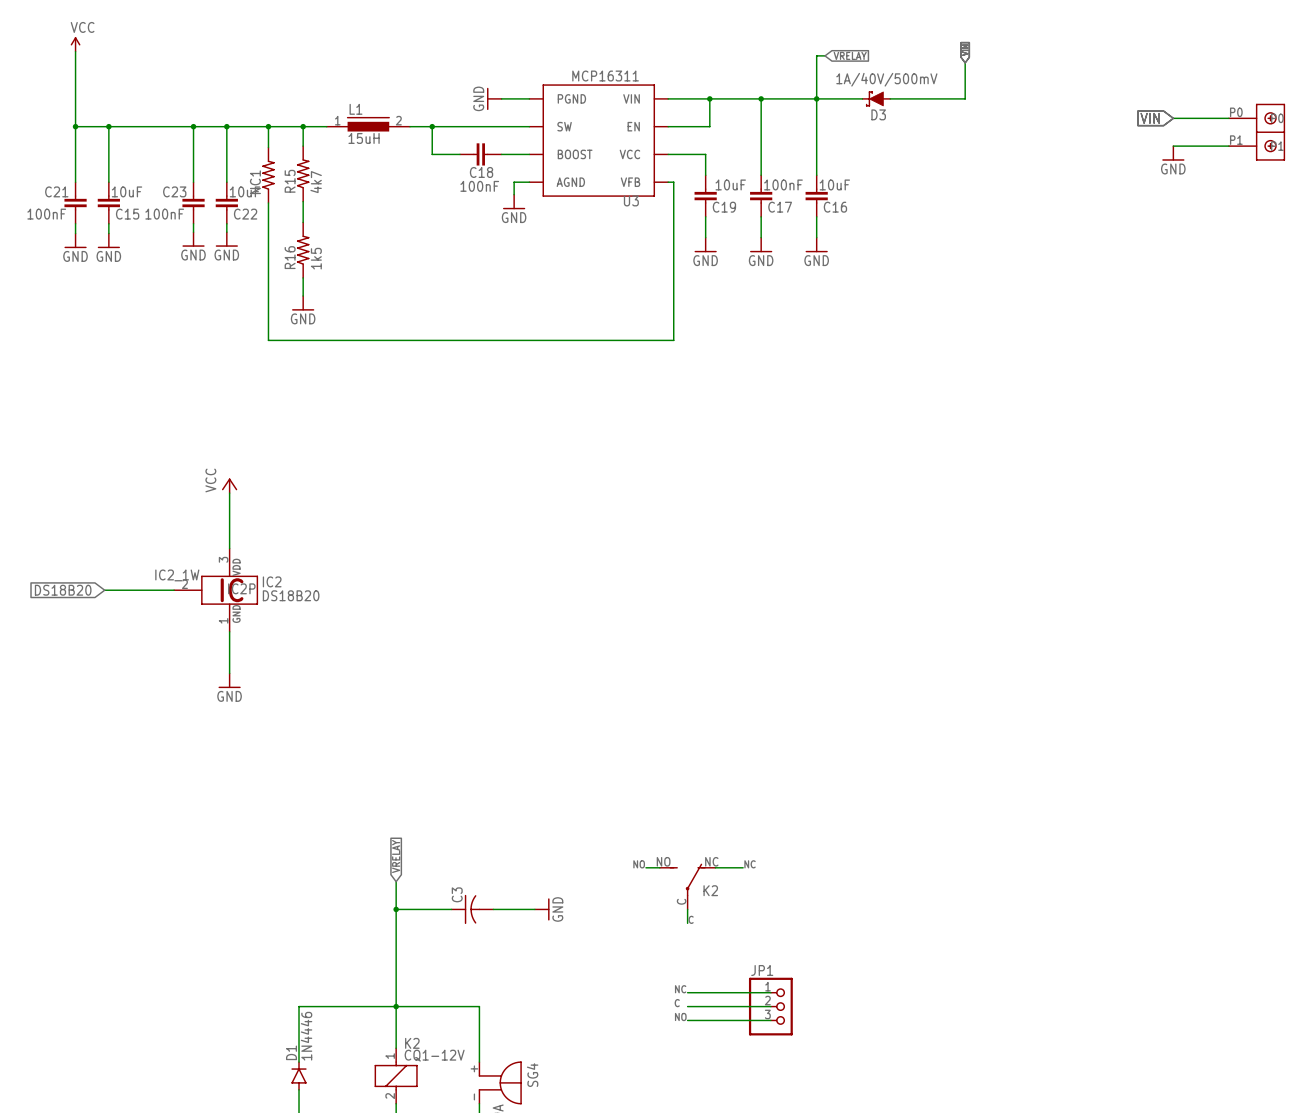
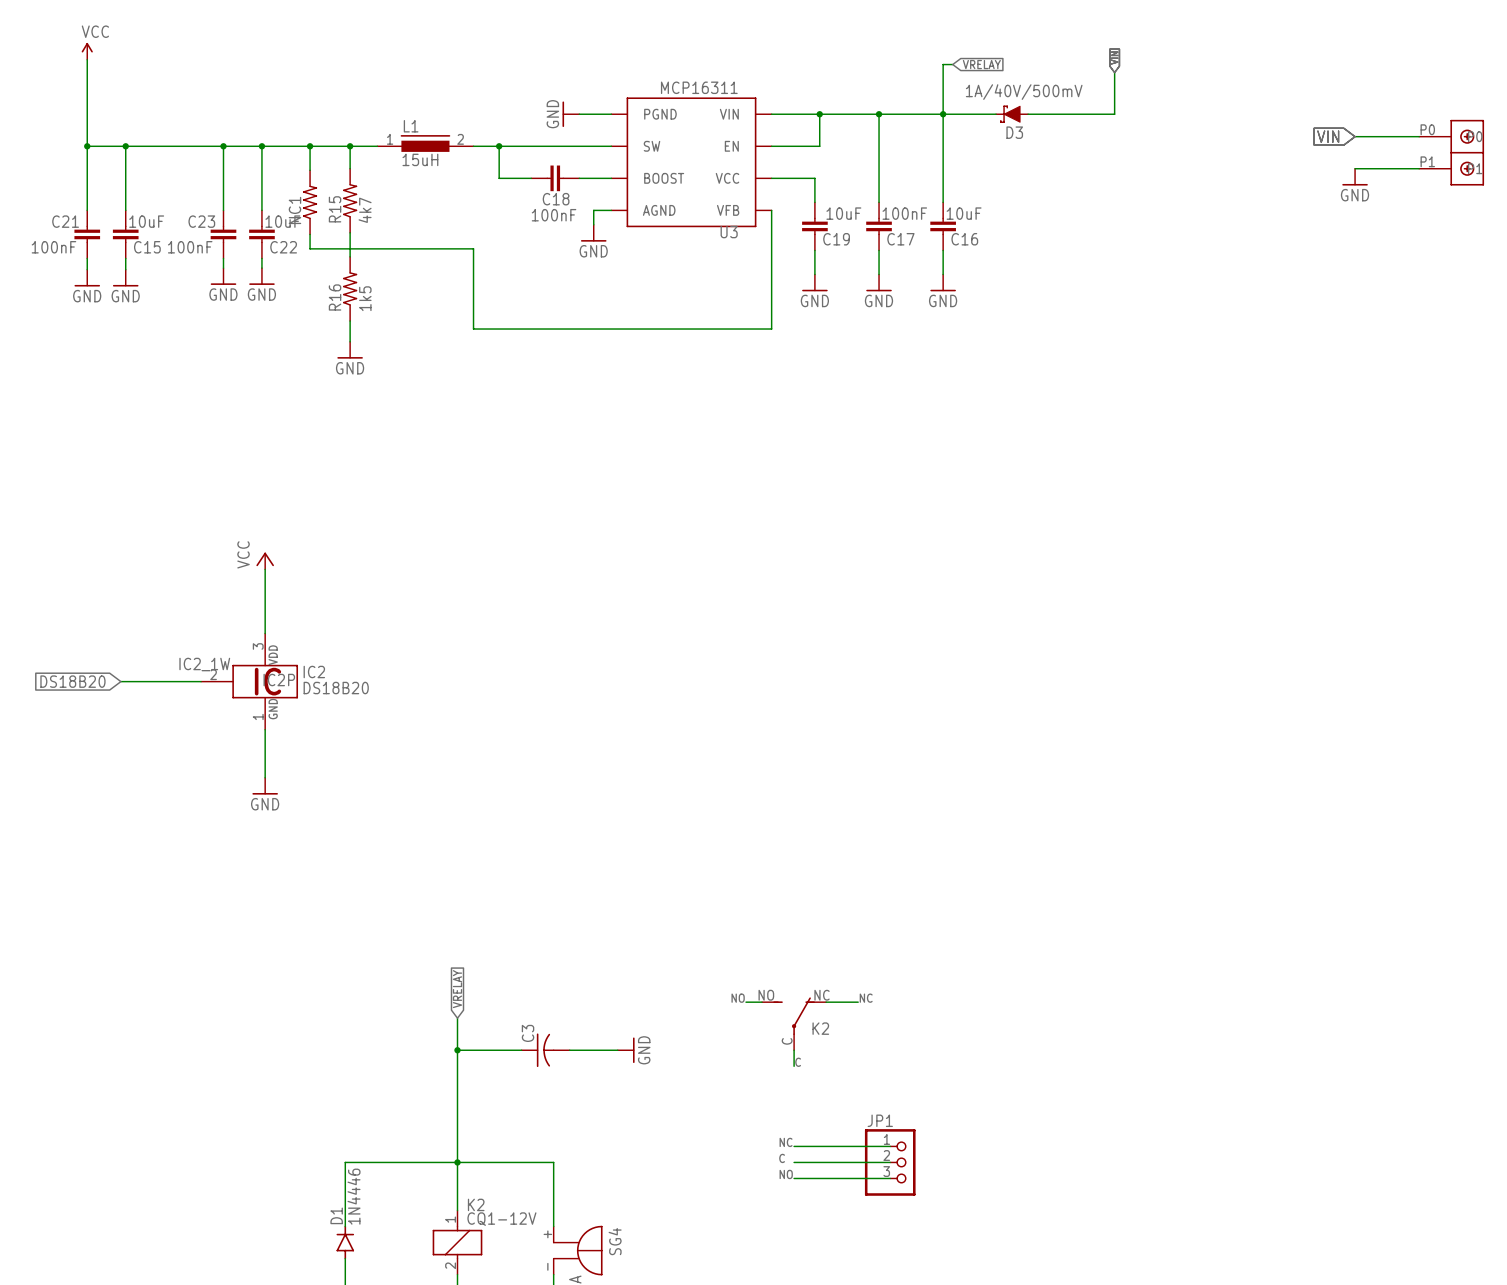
wire: (668, 182) (673, 182) (673, 340) (268, 340) (268, 215) -> (771, 210) (771, 329) (473, 329) (473, 248) (310, 248)

